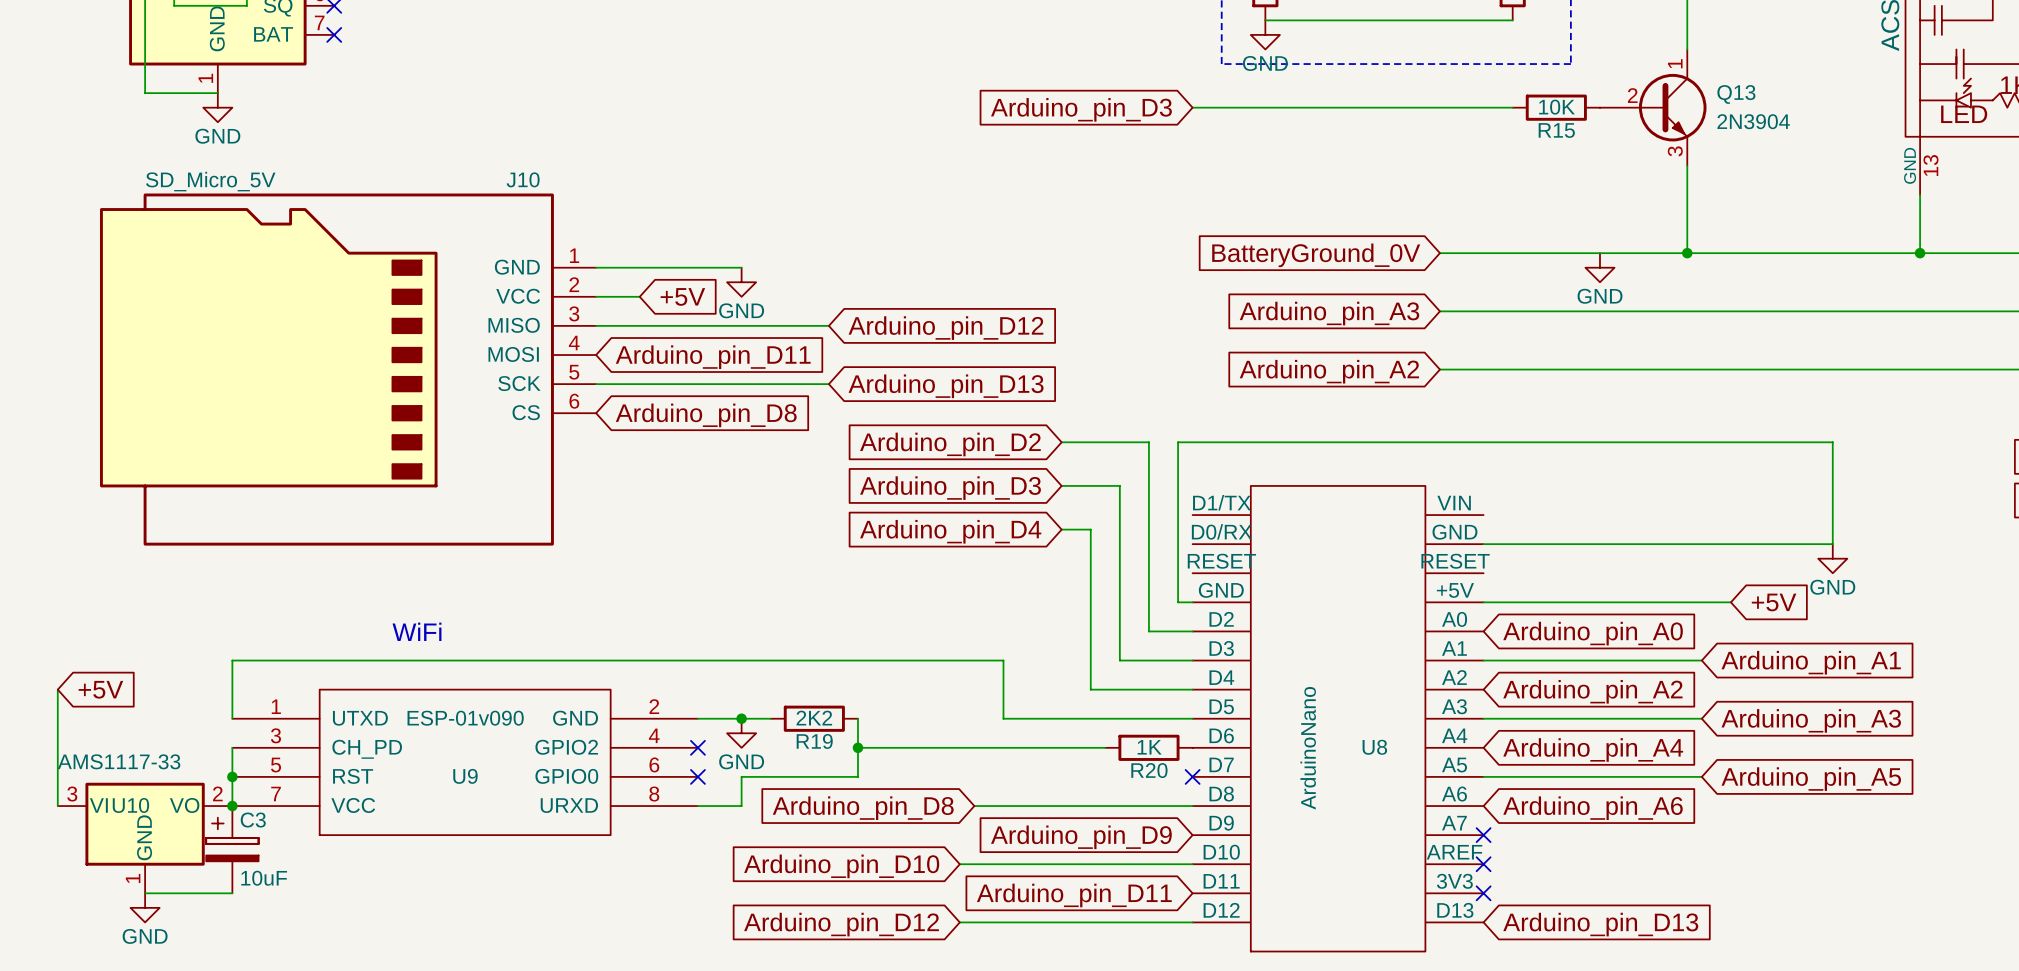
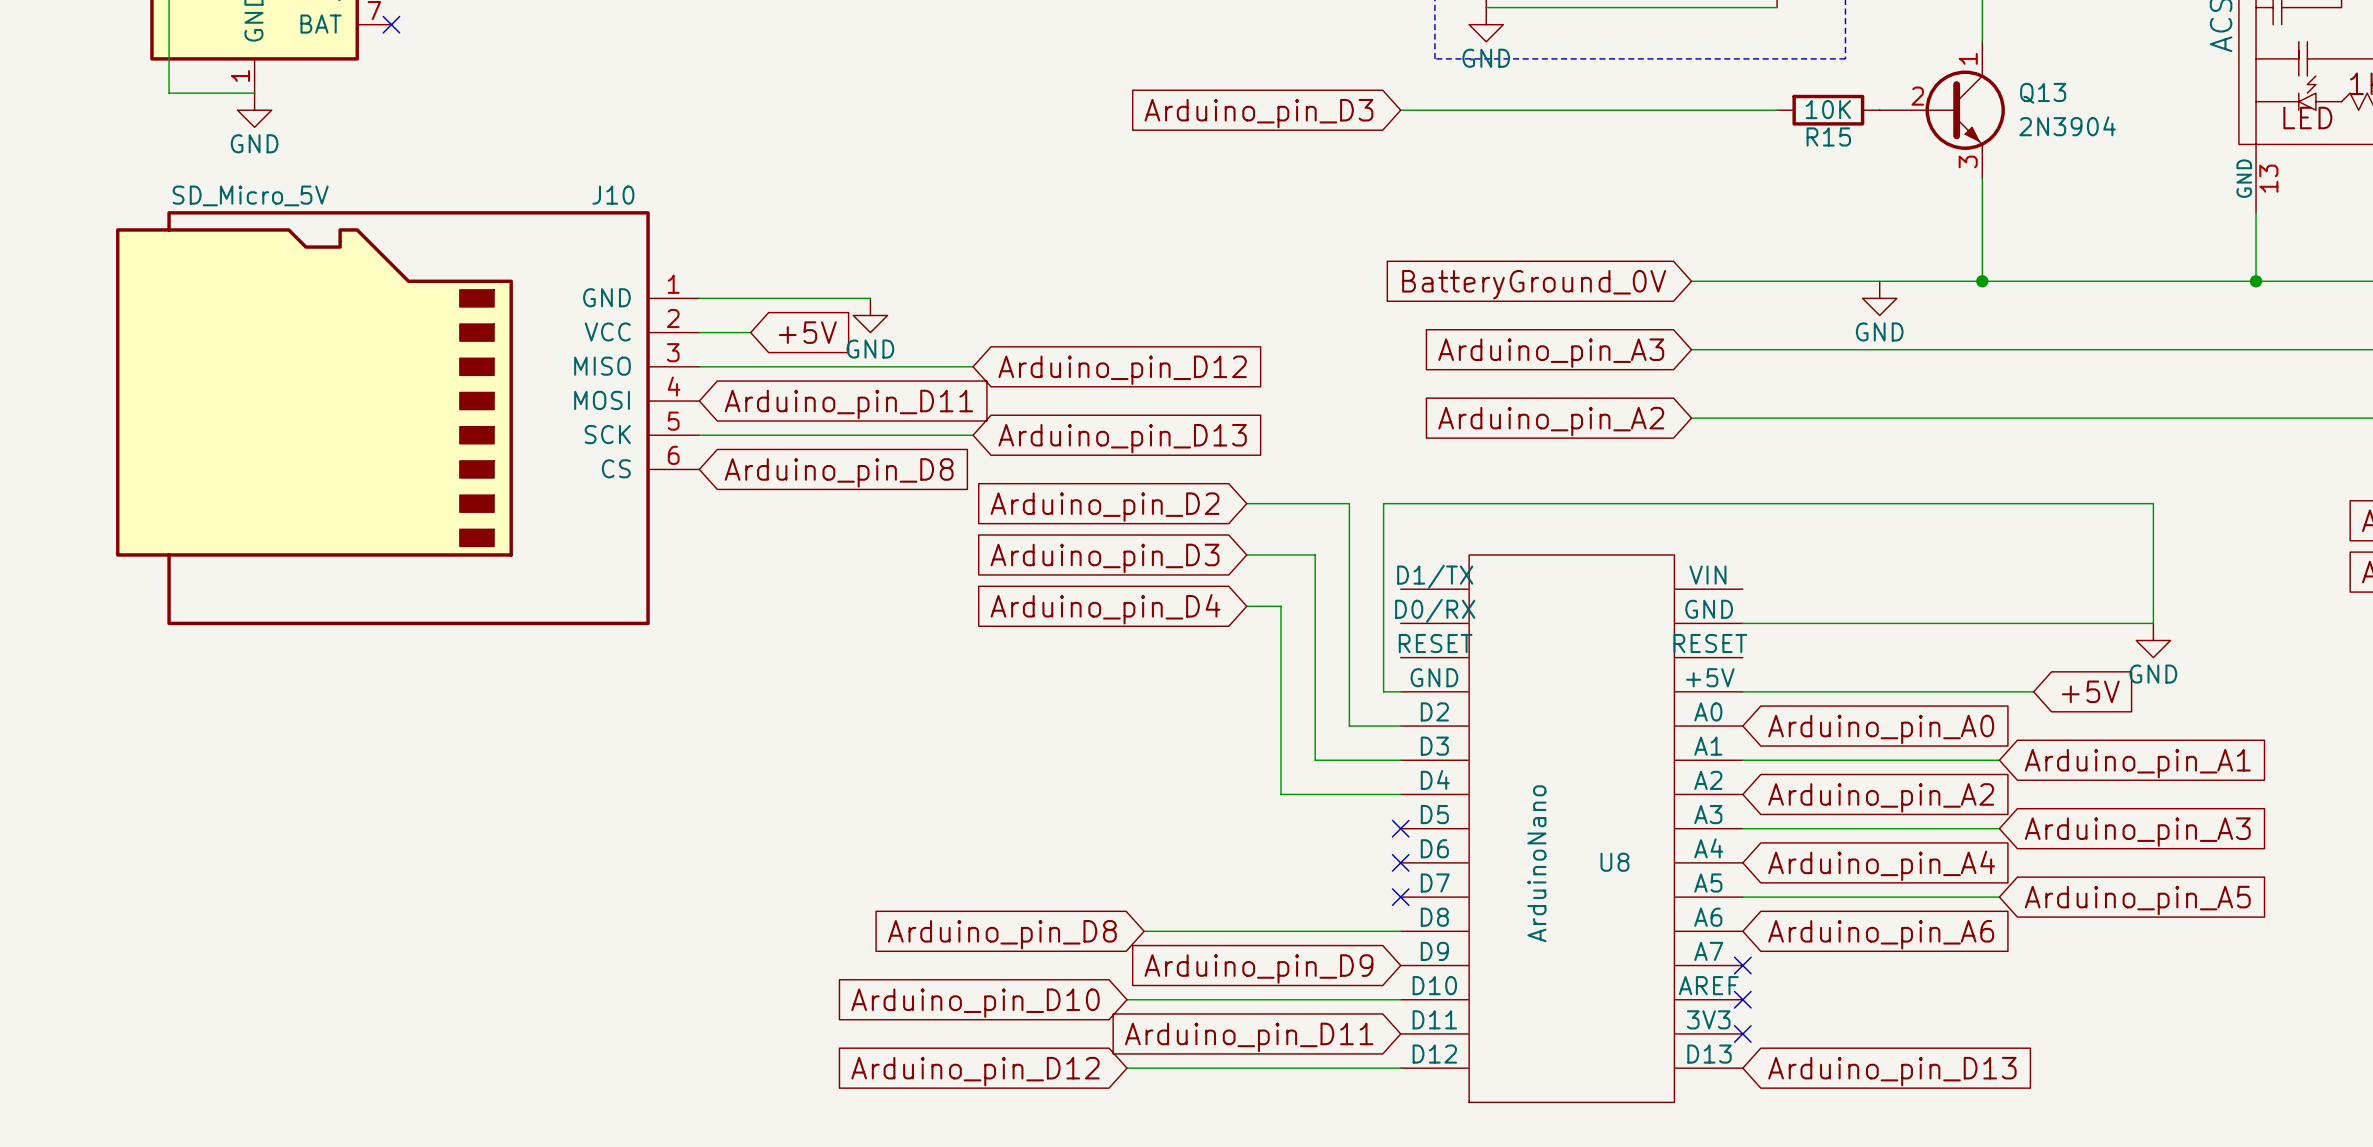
text: WiFi (416, 631) -> none
wire: (57, 689) (57, 806) -> none
global label: +5V (100, 689) -> none
wire: (232, 718) (232, 660) (1003, 660) (1003, 718) (1192, 718) -> none
wire: (697, 718) (770, 718) -> none
junction: (741, 718) -> none
R19: 2K2 (814, 718) -> none
wire: (857, 718) (857, 776) (741, 776) (741, 806) (697, 806) -> none
no-connect mark: none -> (1400, 828)
power symbol: GND (741, 733) -> none
wire: (232, 747) (232, 806) -> none
no-connect mark: (697, 747) -> none
wire: (857, 747) (1105, 747) -> none
junction: (857, 747) -> none
R20: 1K (1148, 747) -> none
no-connect mark: none -> (1400, 862)
U9: ESP-01v090 (465, 762) -> none
junction: (232, 776) -> none
no-connect mark: (697, 776) -> none
junction: (232, 806) -> none
U10: AMS1117-33 (145, 838) -> none
C3: 10uF (232, 849) -> none
wire: (145, 893) (232, 893) -> none
power symbol: GND (145, 907) -> none

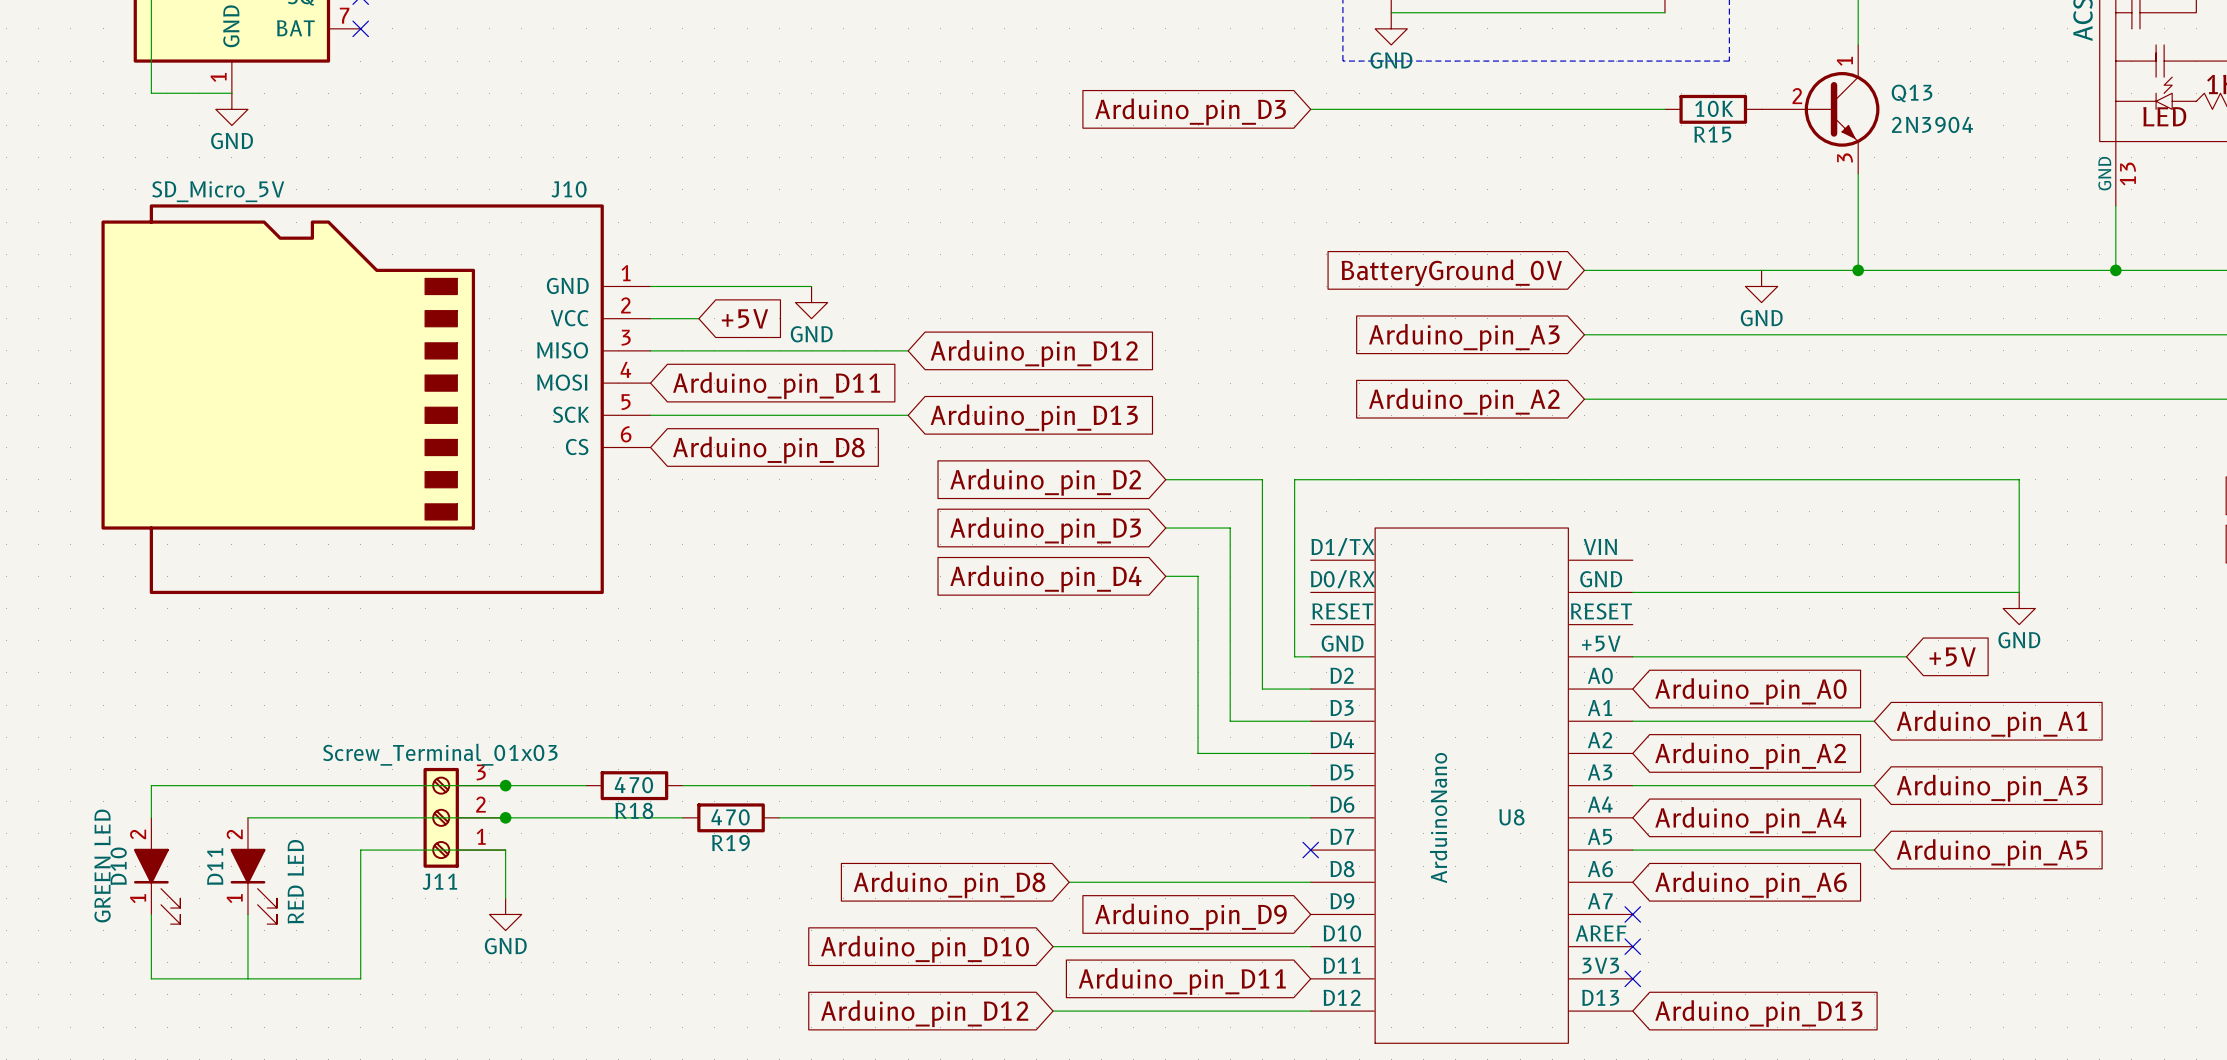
junction: none -> (505, 785)
wire: none -> (586, 785) (151, 785) (151, 817)
R18: none -> 470 (634, 785)
wire: none -> (682, 785) (1310, 785)
no-connect mark: (1400, 828) -> none
wire: none -> (247, 817) (682, 817)
J11: none -> Screw_Terminal_01x03 (464, 817)
junction: none -> (505, 817)
R19: none -> 470 (731, 817)
wire: none -> (779, 817) (1310, 817)
no-connect mark: (1400, 862) -> none
D10: none -> GREEN LED (157, 870)
D11: none -> RED LED (253, 870)
wire: none -> (505, 898) (505, 850) (360, 850) (360, 978) (151, 978) (151, 914)
wire: none -> (247, 914) (247, 978)
power symbol: none -> GND (505, 914)

